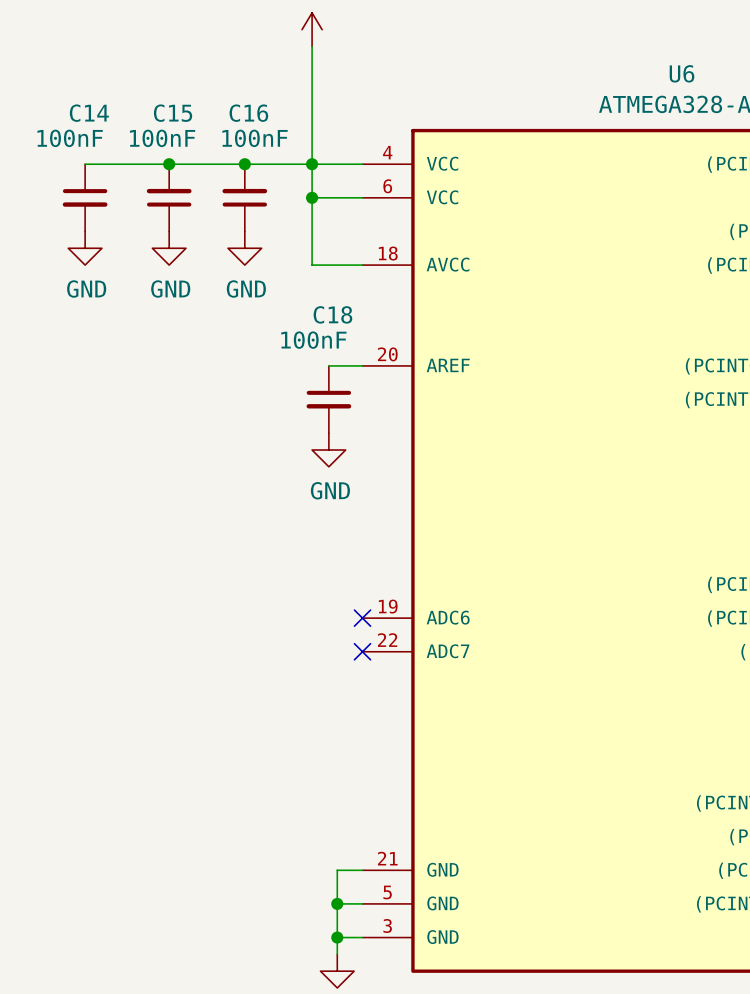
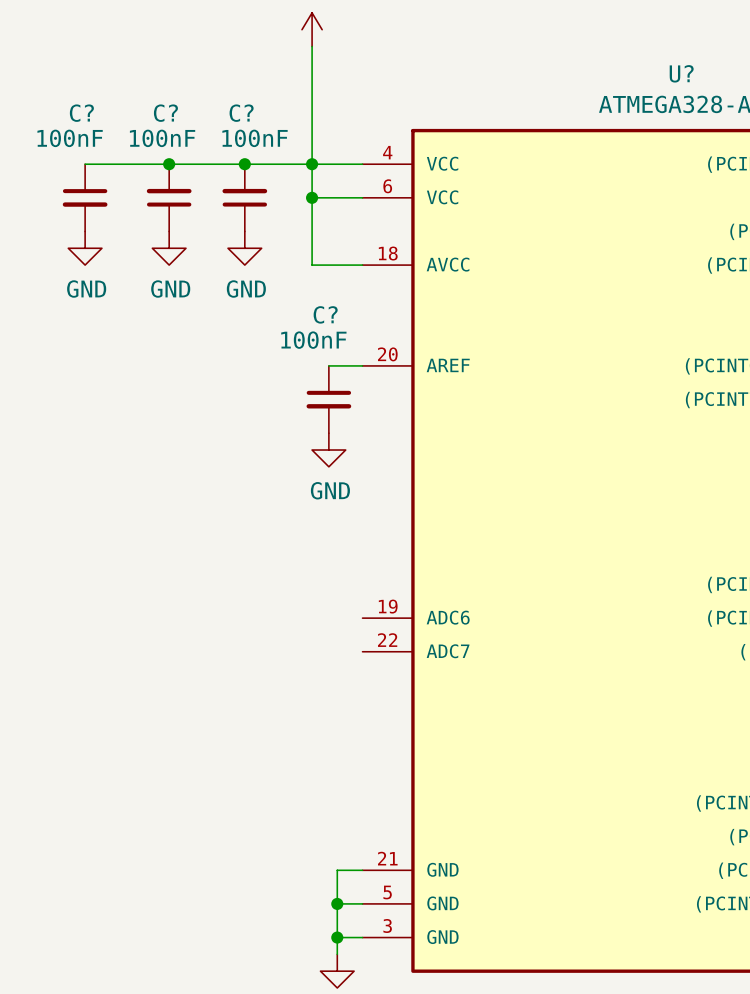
U6 name: U6 (682, 73) -> U? (681, 73)
C14 name: C14 (89, 113) -> C? (81, 113)
C15 name: C15 (173, 113) -> C? (165, 113)
C16 name: C16 (248, 113) -> C? (241, 113)
C18 name: C18 (332, 314) -> C? (325, 314)
no-connect mark: (362, 618) -> none
no-connect mark: (362, 651) -> none

